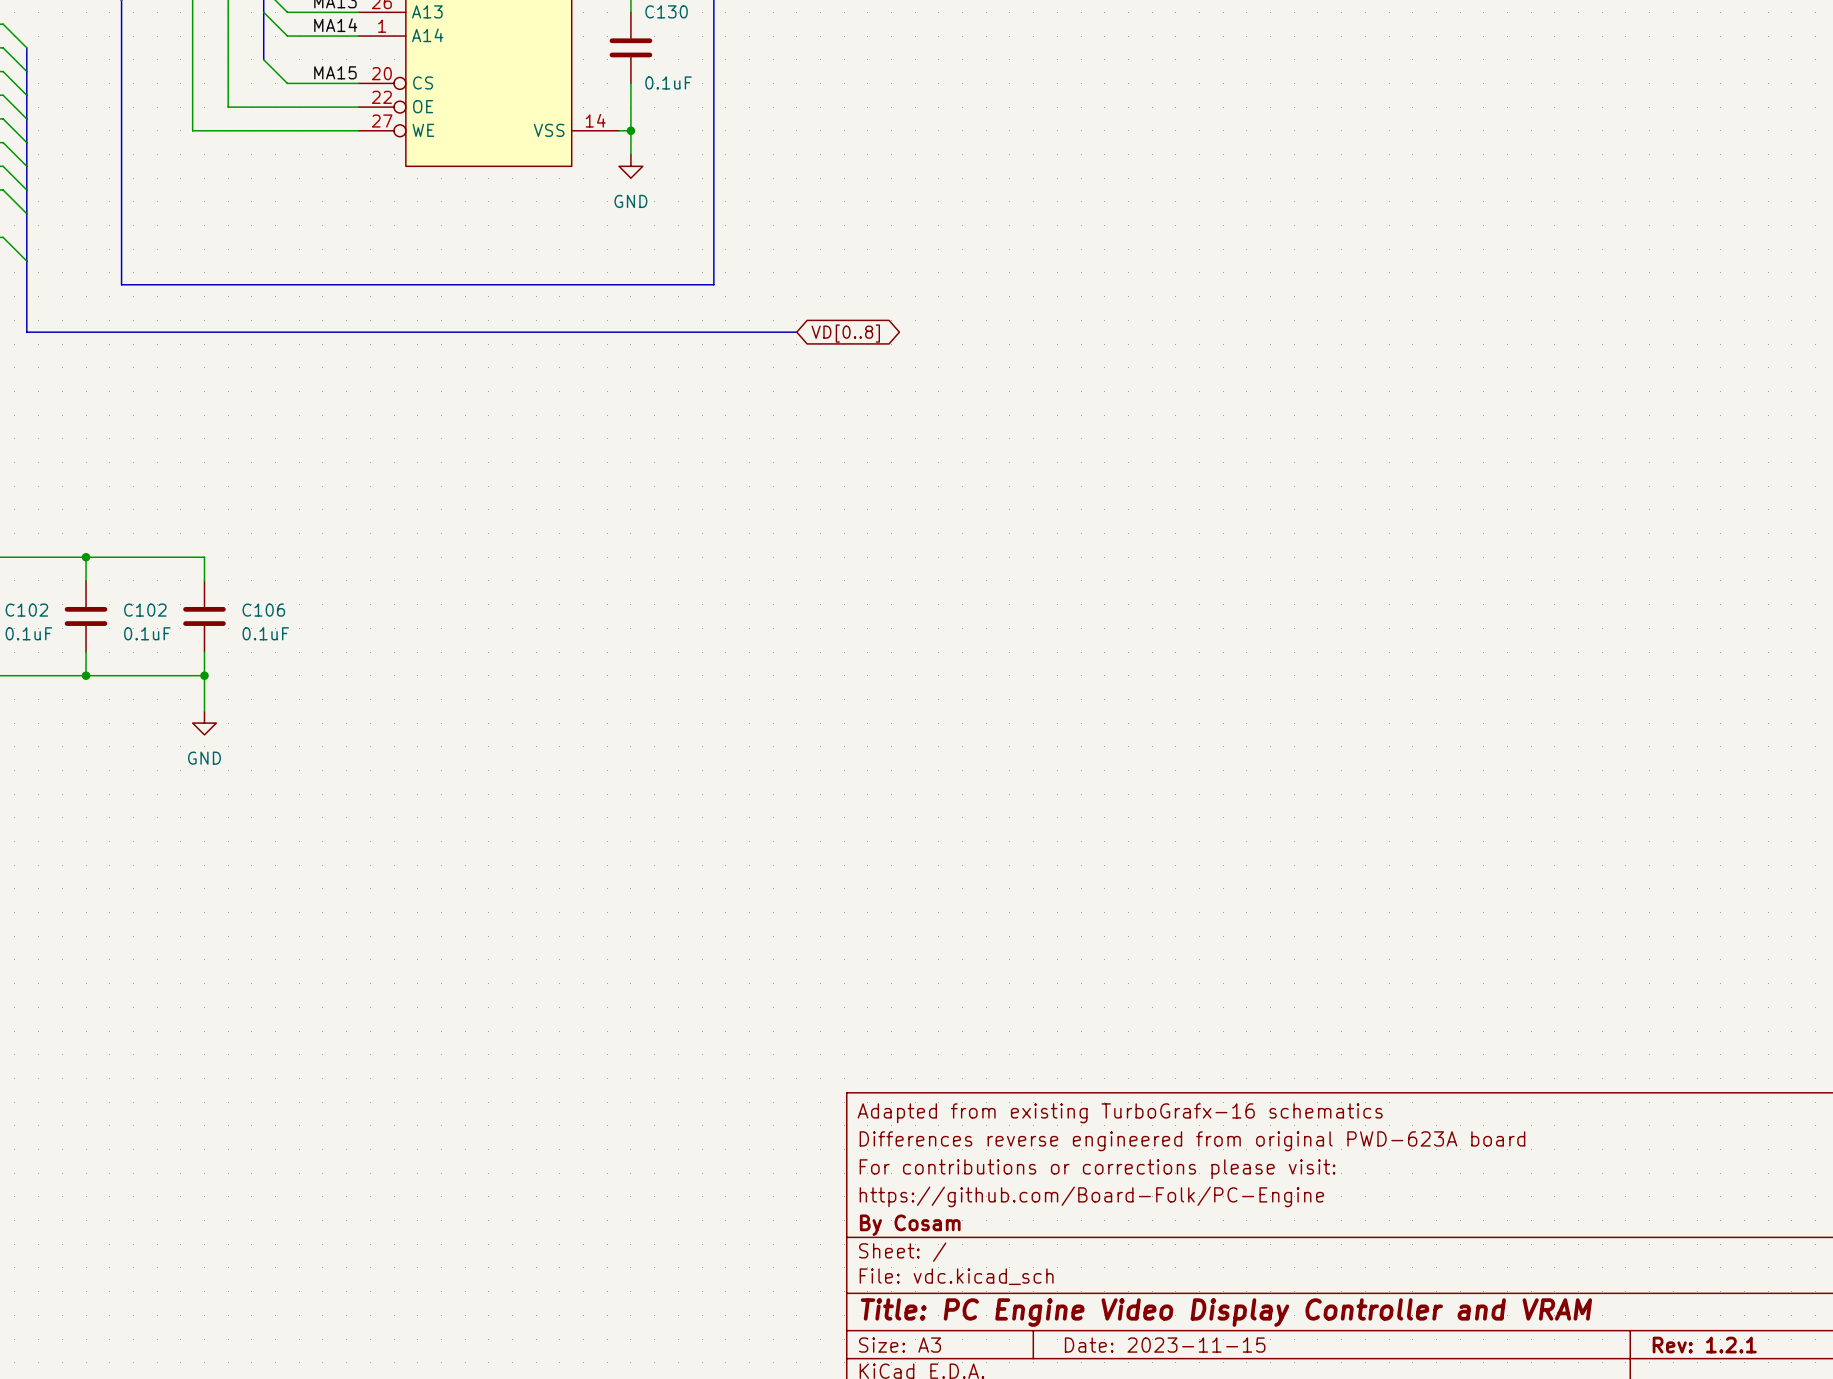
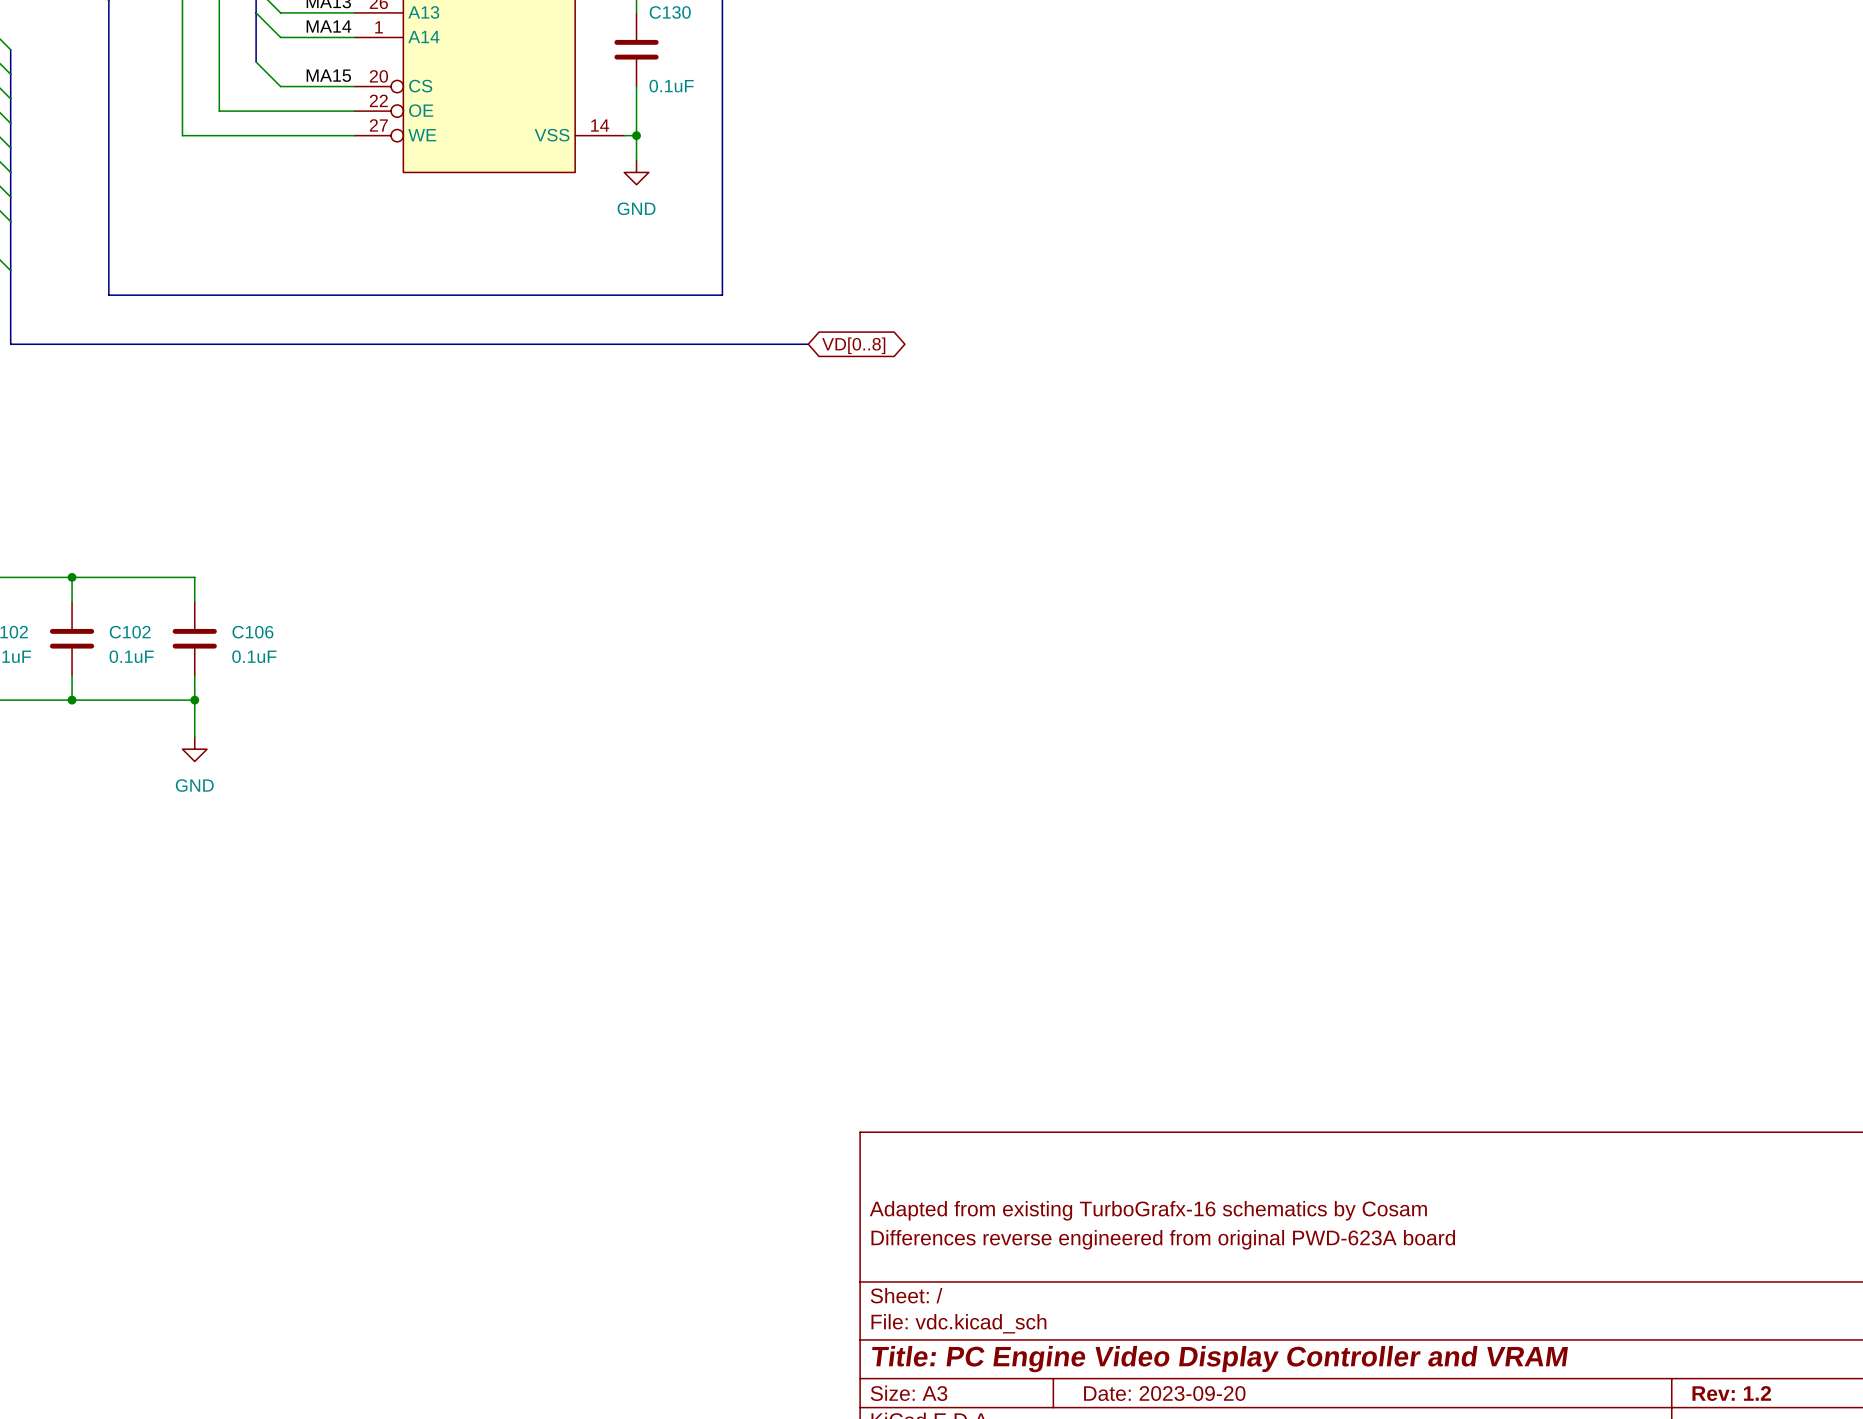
title block: Adapted from existing TurboGrafx-16 schematics (1120, 1113) -> none
title block: Differences reverse engineered from original PWD-623A board (1192, 1141) -> none
title block: For contributions or corrections please visit: (1097, 1169) -> Adapted from existing TurboGrafx-16 schematics by Cosam (1148, 1210)
title block: https://github.com/Board-Folk/PC-Engine (1091, 1196) -> Differences reverse engineered from original PWD-623A board (1163, 1239)
title block: By Cosam (910, 1225) -> none
title block: Date: 2023-11-15 (1165, 1345) -> Date: 2023-09-20 (1164, 1393)
title block: Rev: 1.2.1 (1704, 1345) -> Rev: 1.2 (1731, 1393)

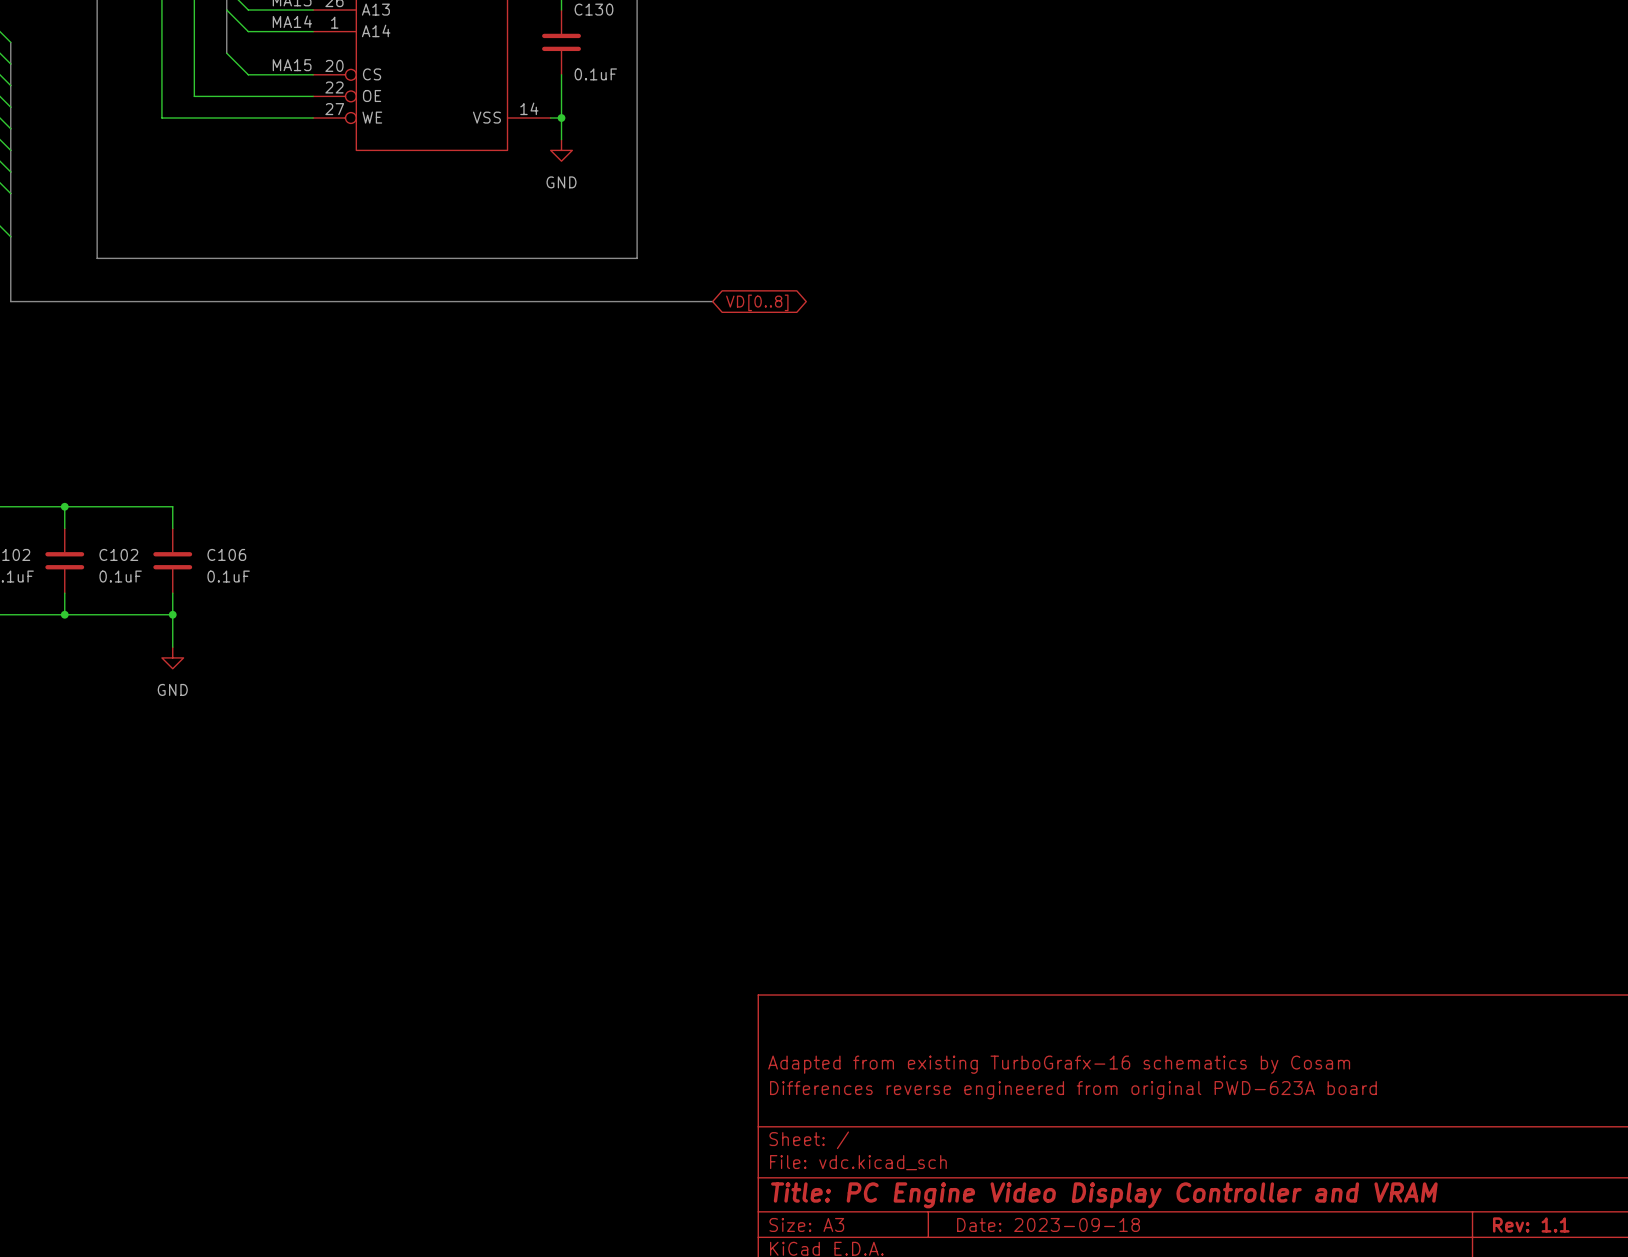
title block: Date: 2023-09-20 (1164, 1393) -> Date: 2023-09-18 (1048, 1224)
title block: Rev: 1.2 (1731, 1393) -> Rev: 1.1 (1531, 1224)

